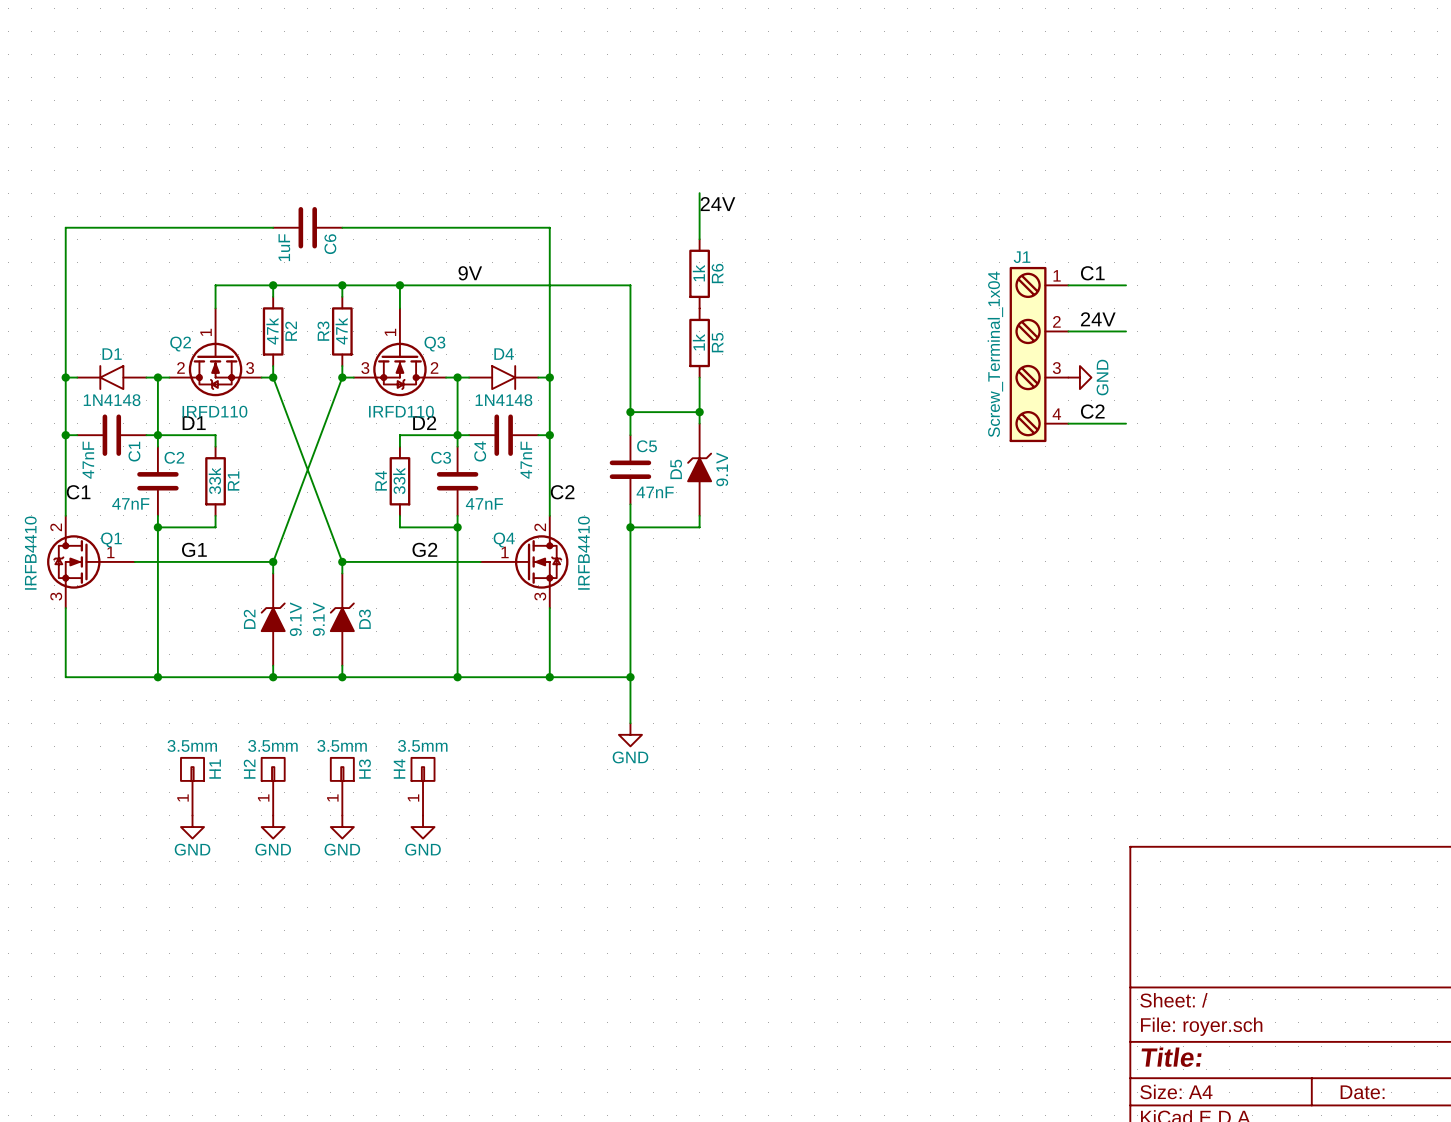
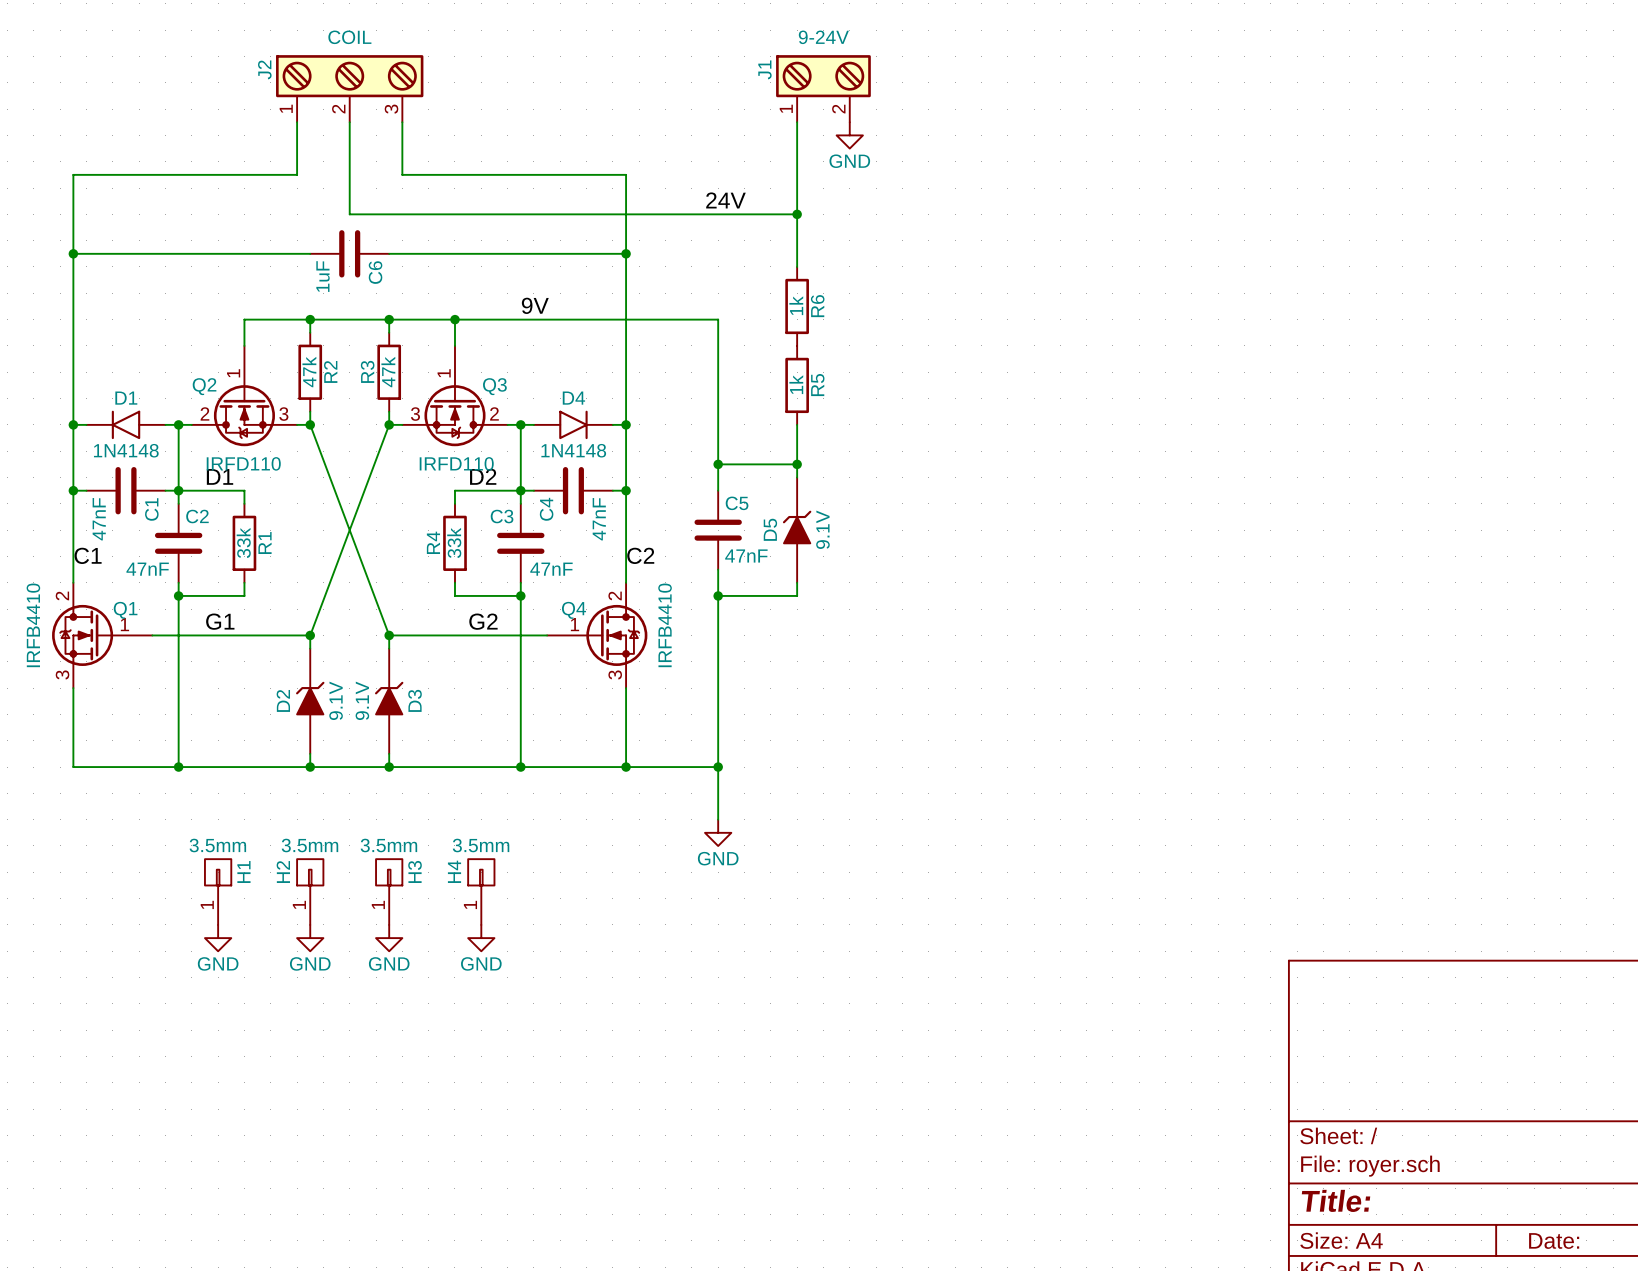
J2: none -> COIL (349, 88)
wire: none -> (297, 122) (297, 174) (73, 174) (73, 253)
wire: none -> (349, 122) (349, 214) (797, 214) (797, 122)
wire: none -> (402, 122) (402, 174) (626, 174) (626, 253)
power symbol: none -> GND (849, 135)
junction: none -> (797, 214)
label position: 24V (717, 204) -> 24V (725, 200)
junction: none -> (73, 253)
junction: none -> (626, 253)
J1 name position: J1 (1022, 257) -> J1 (764, 69)
J1 symbol: [1009, 266, 1069, 443] -> [776, 55, 871, 123]
label: C1 (1092, 273) -> none
wire: (1068, 285) (1126, 285) -> none
label: 24V (1098, 319) -> none
wire: (1068, 331) (1126, 331) -> none
J1 value: Screw_Terminal_1x04 (995, 354) -> 9-24V (823, 37)
power symbol: GND (1079, 377) -> none
label: C2 (1092, 411) -> none
wire: (1068, 423) (1126, 423) -> none

